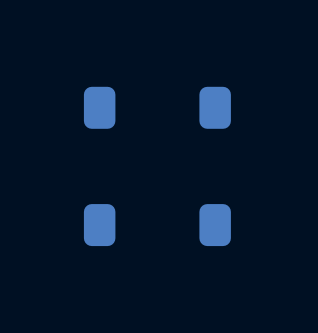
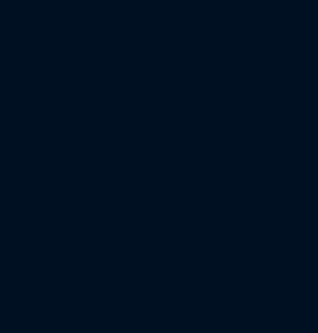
part: (157, 107) -> none
part: (157, 225) -> none

